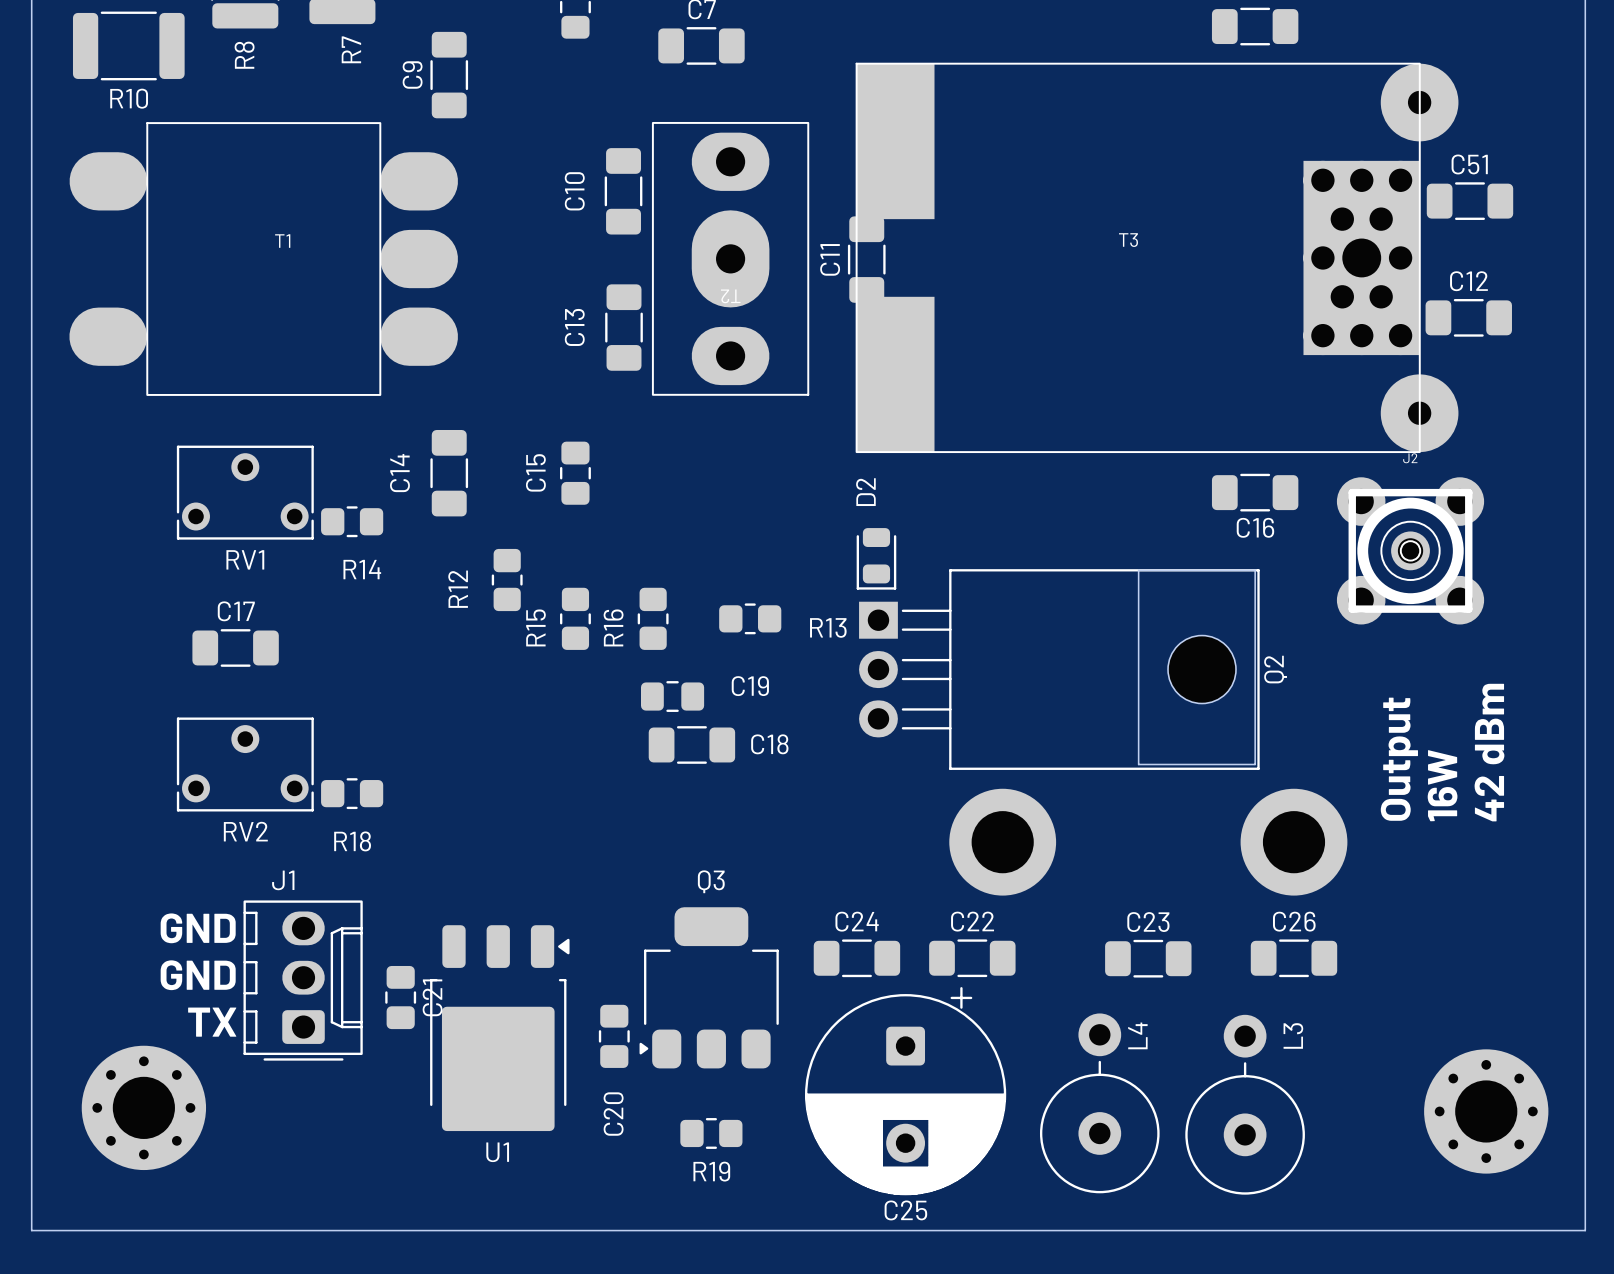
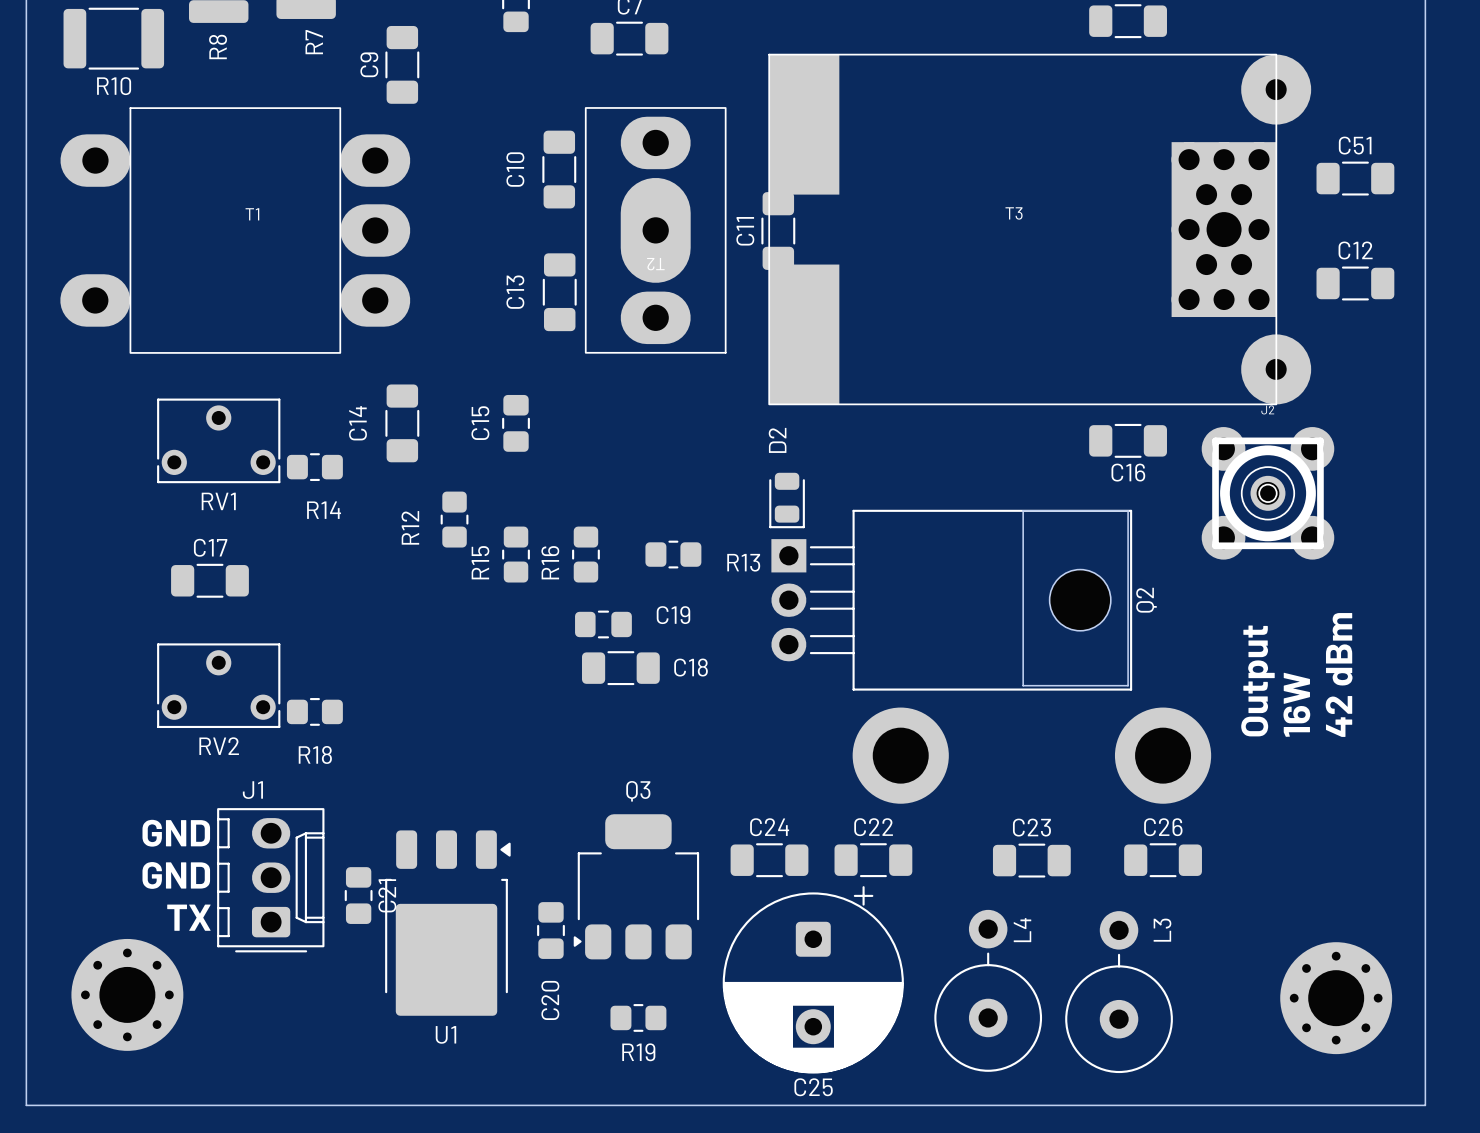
T2 footprint: [651, 121, 810, 396] -> [584, 107, 727, 354]
T1 footprint: [69, 122, 458, 396] -> [60, 107, 411, 354]
C51 position: (1469, 201) -> (1355, 178)
C12 position: (1468, 317) -> (1355, 283)

